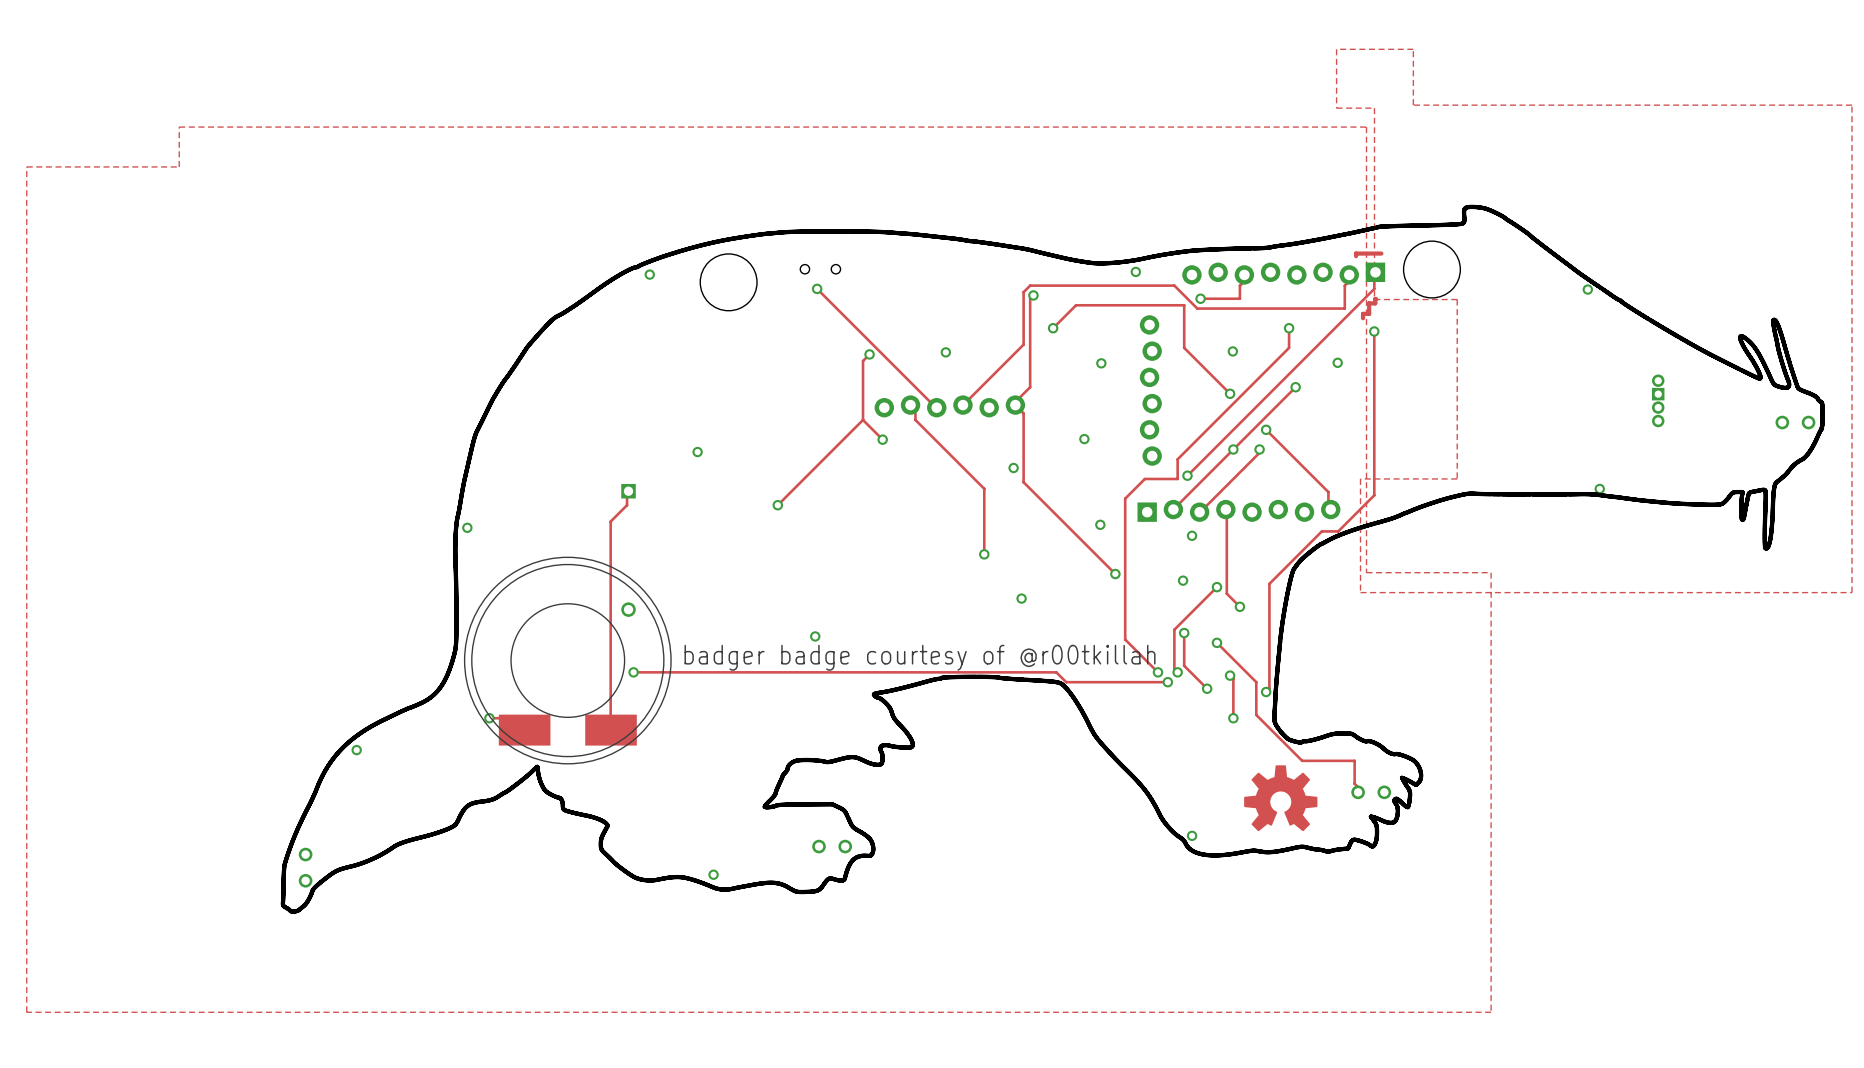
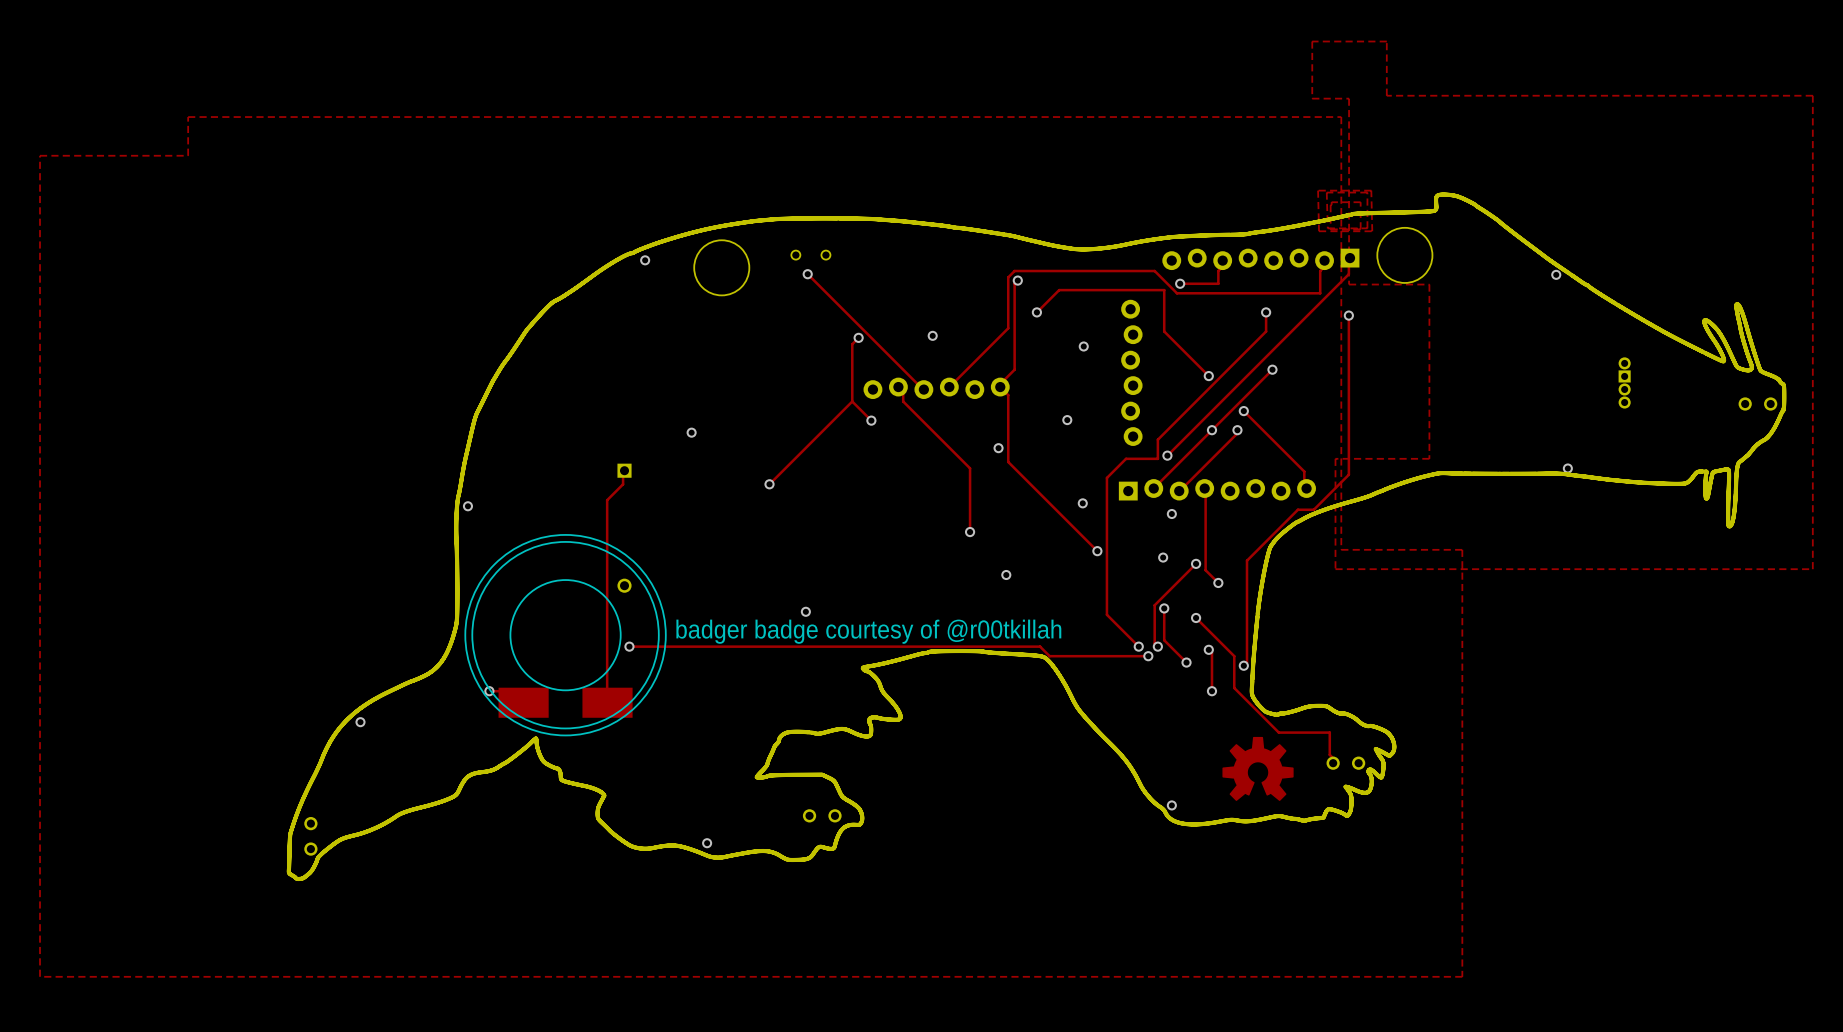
zone outline: none -> (1318, 190) (1319, 231) (1372, 231) (1371, 190) (1318, 190)
zone outline: none -> (1326, 192) (1367, 192) (1367, 228) (1327, 228) (1326, 192)
zone outline: none -> (1331, 202) (1360, 202) (1360, 229) (1330, 229) (1331, 202)
track: (1381, 253) (1356, 253) (1356, 256) -> none
via: (1135, 271) -> none
track: (1376, 299) (1375, 303) (1369, 303) (1369, 313) (1363, 313) (1363, 318) -> none
via: (1232, 351) -> none
via: (1337, 362) -> none

